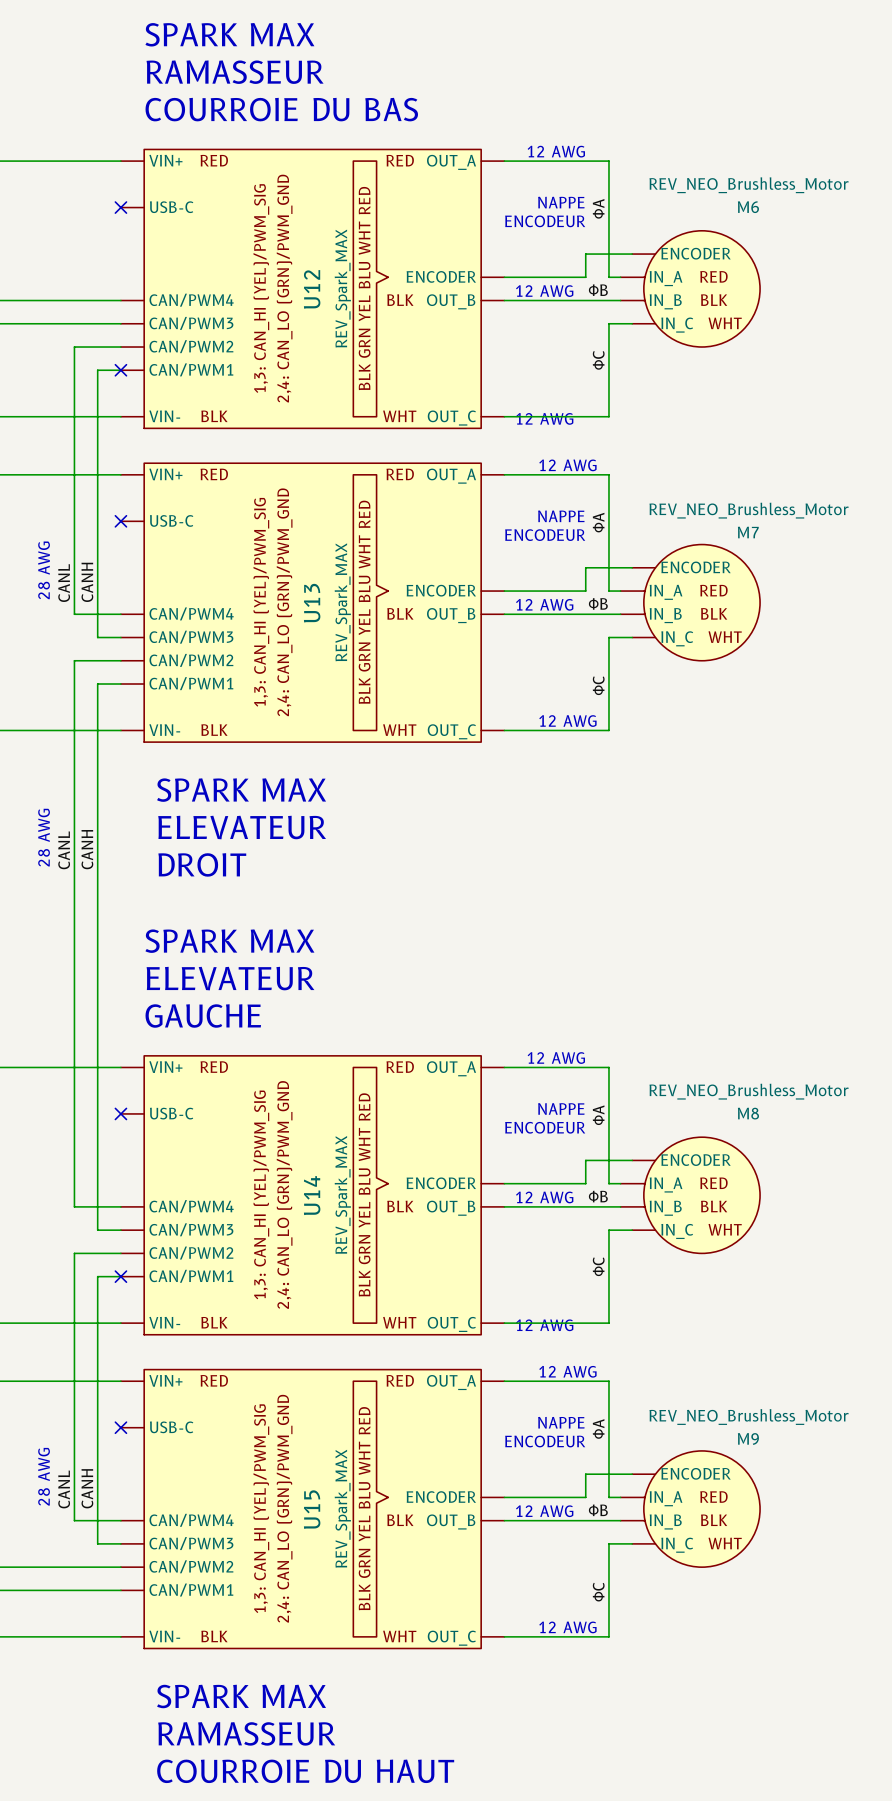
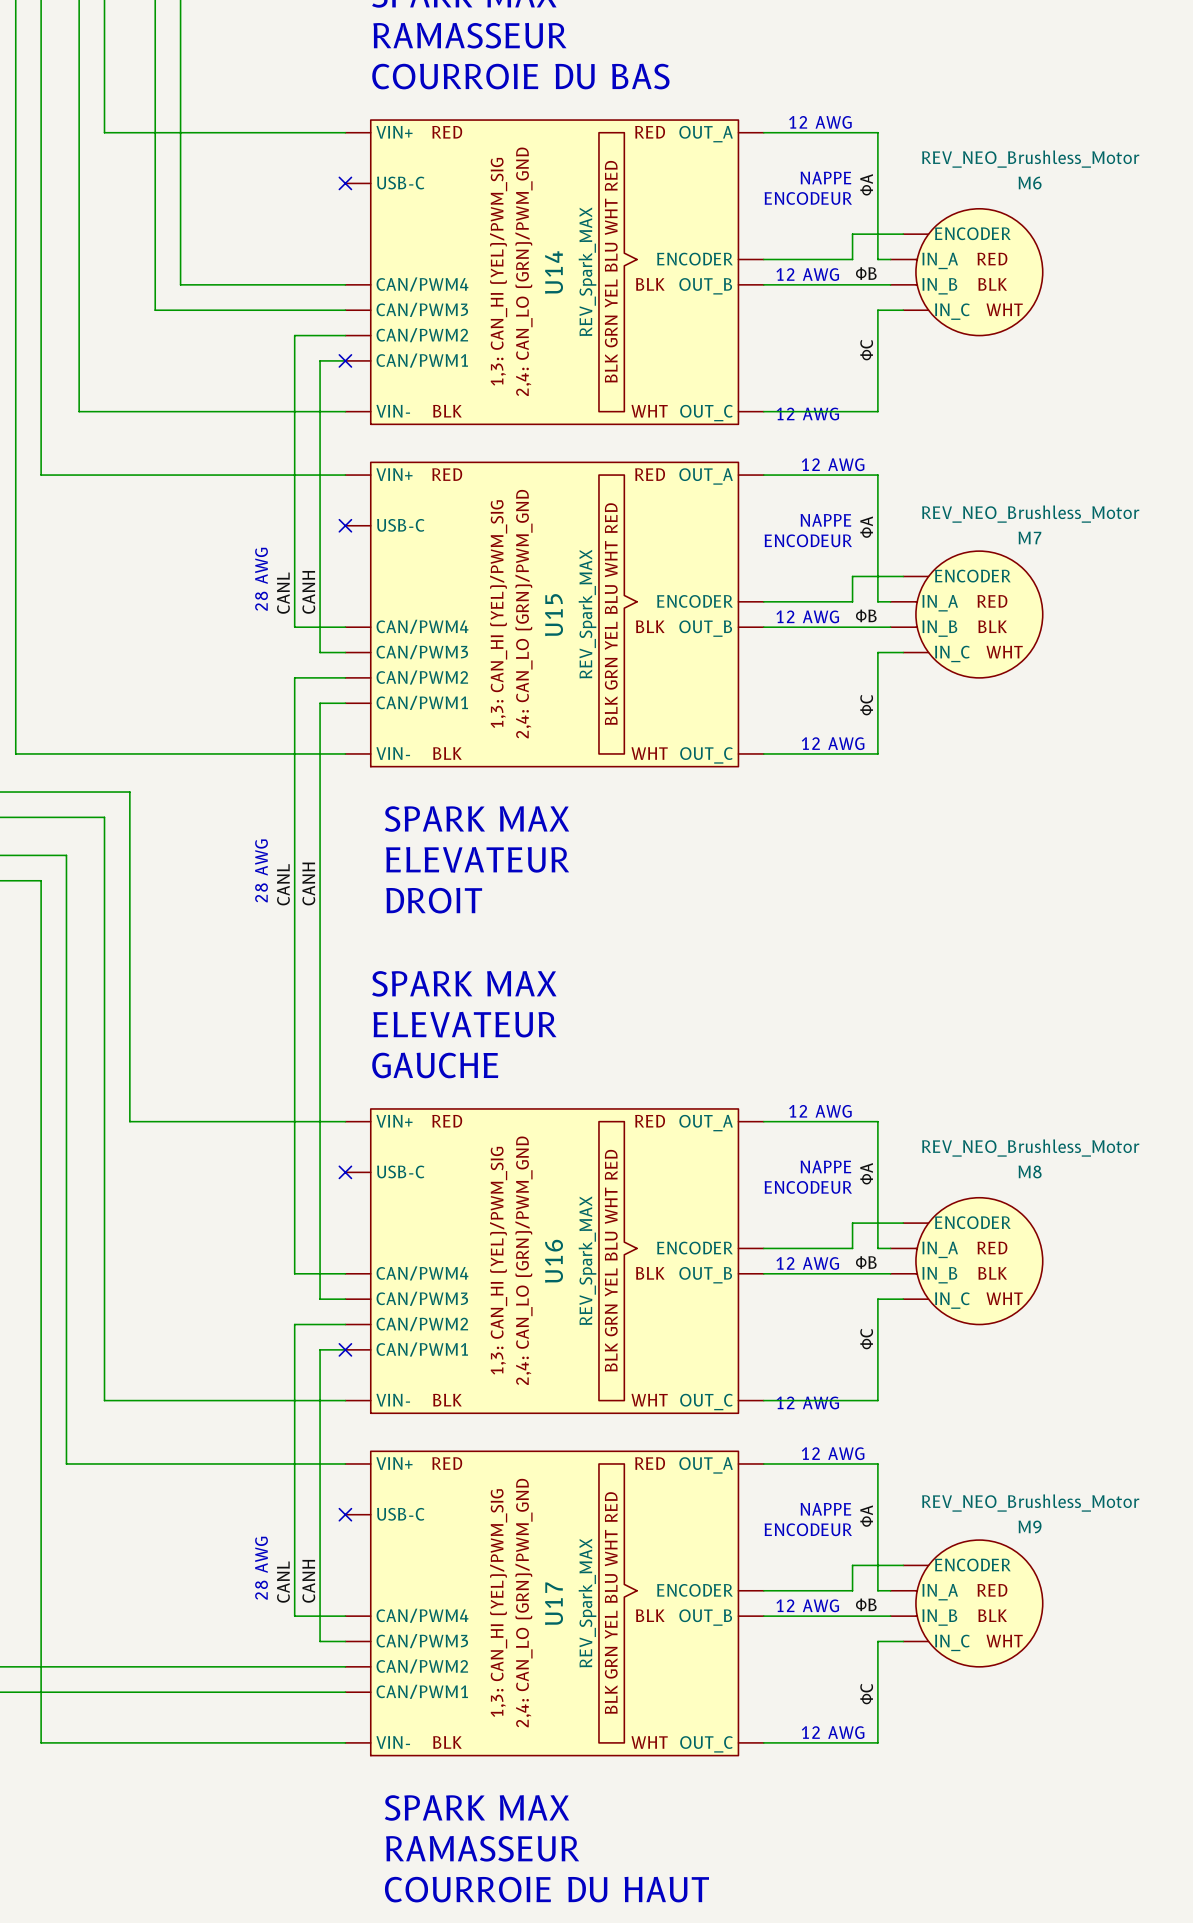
U12 name: U12 (312, 289) -> U14 (554, 272)
U13 name: U13 (312, 603) -> U15 (554, 615)
U14 name: U14 (312, 1195) -> U16 (554, 1261)
U15 name: U15 (312, 1509) -> U17 (554, 1603)

